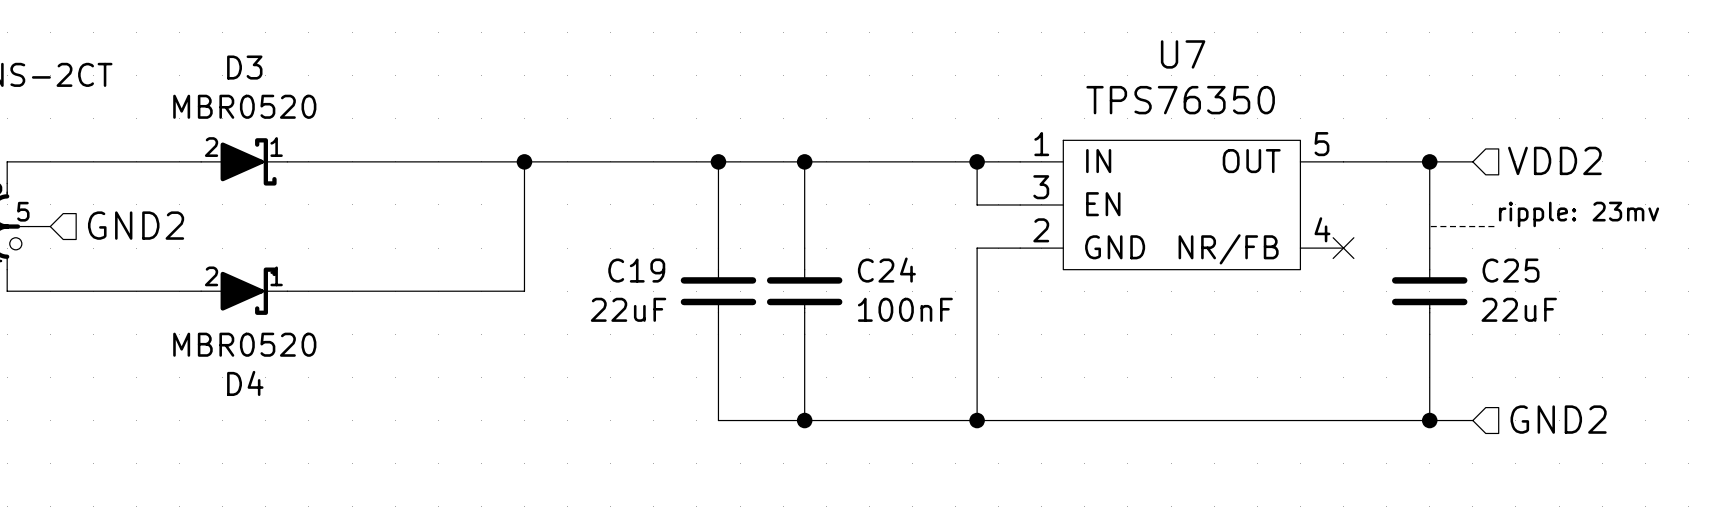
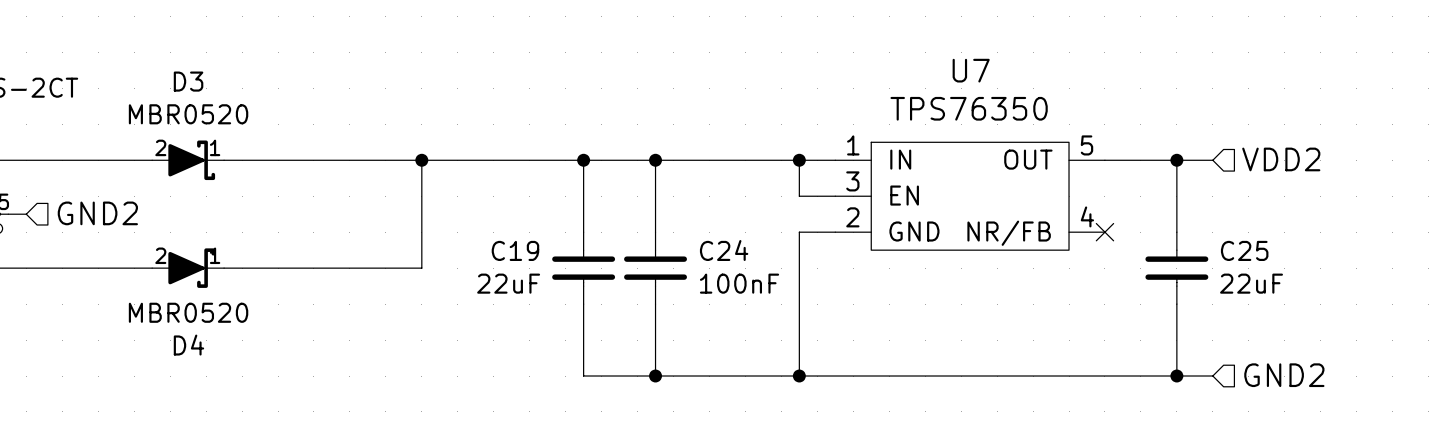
text: ripple: 23mv (1579, 214) -> none
line: (1429, 226) (1494, 226) -> none

